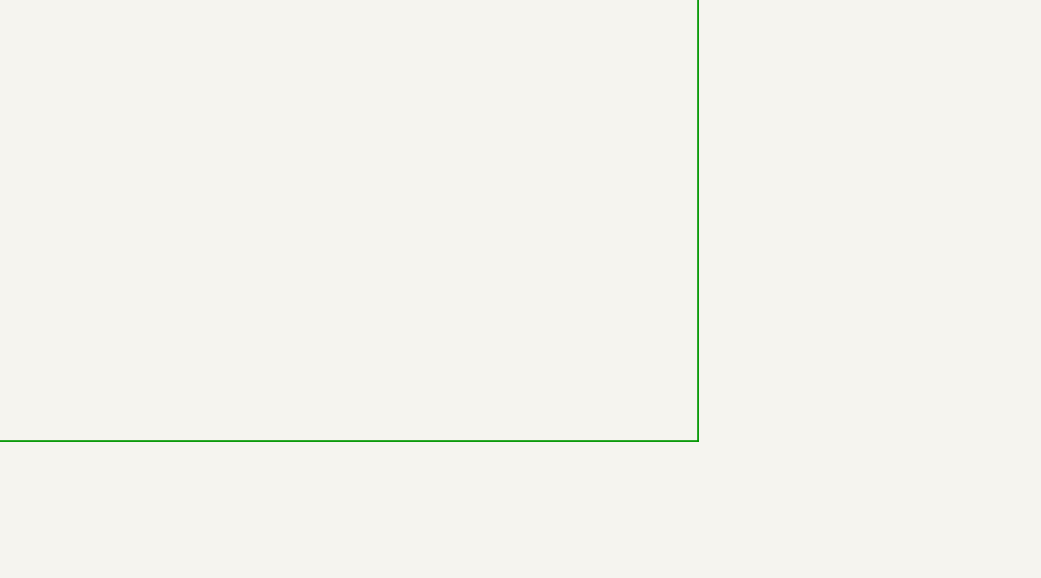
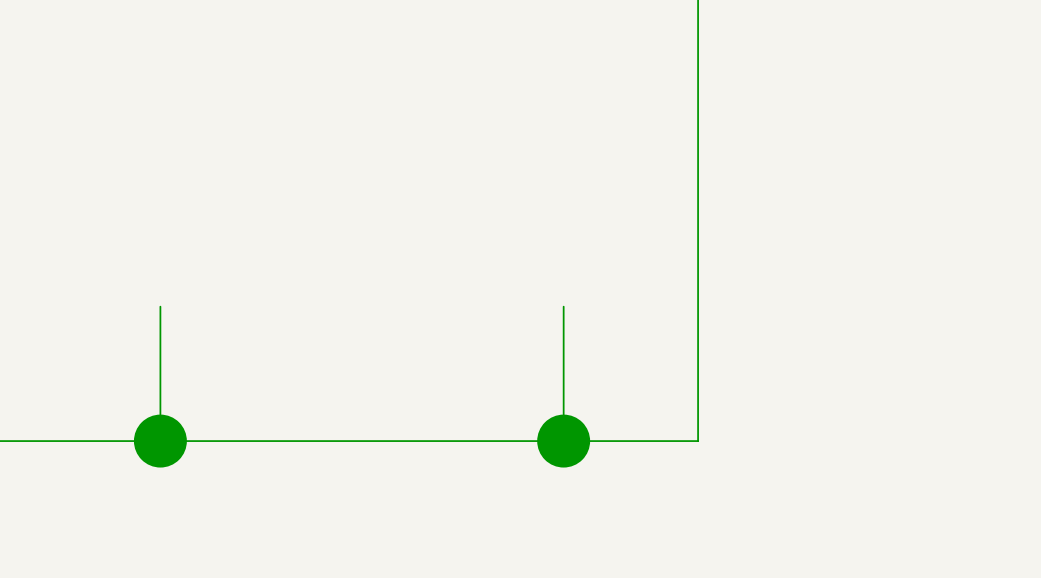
wire: none -> (160, 306) (160, 441)
wire: none -> (563, 306) (563, 441)
junction: none -> (160, 441)
junction: none -> (563, 441)

